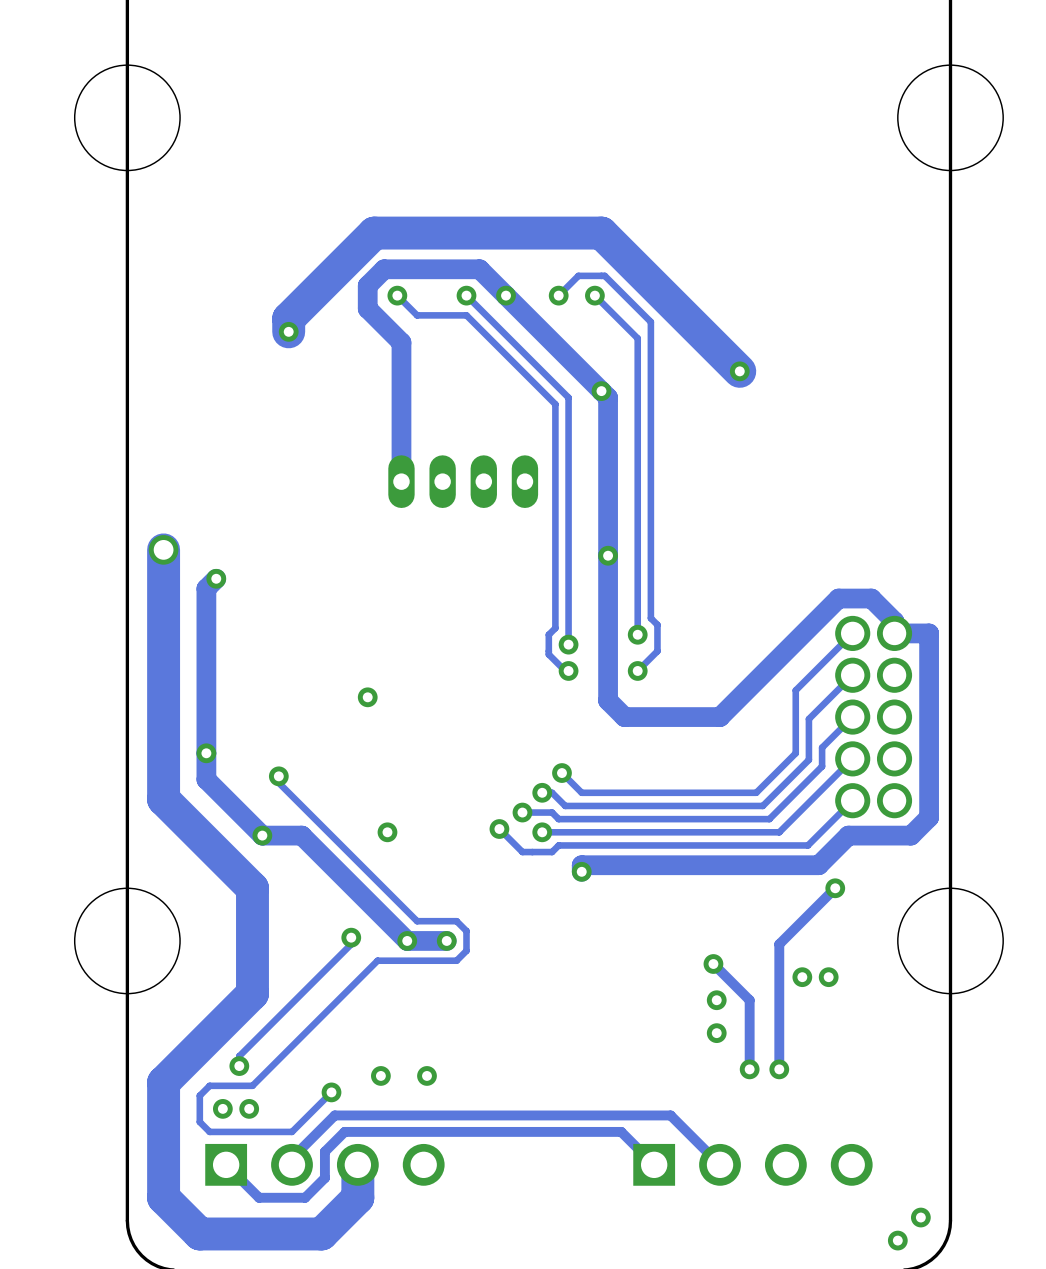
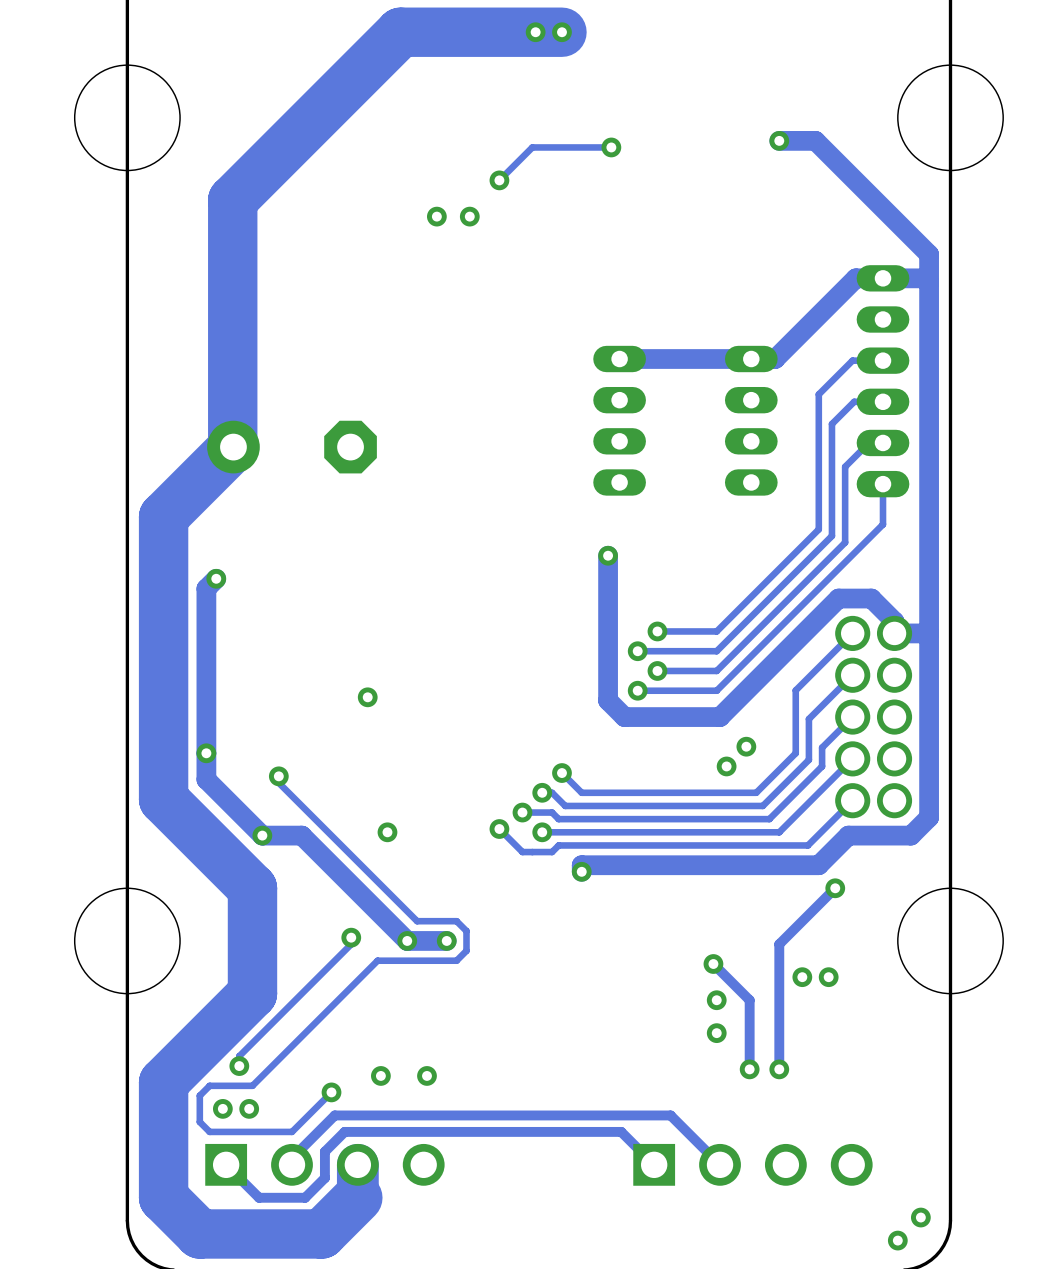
via: none -> (535, 32)
track: none -> (561, 32) (400, 32) (232, 200) (232, 447)
via: none -> (561, 32)
track: none -> (779, 140) (815, 140) (929, 254) (929, 633)
via: none -> (779, 140)
track: none -> (611, 147) (532, 147) (499, 180)
via: none -> (611, 147)
via: none -> (499, 180)
via: none -> (436, 216)
via: none -> (469, 216)
track: none -> (929, 282) (924, 278) (855, 278) (775, 359) (619, 359)
track: (397, 295) (417, 315) (466, 315) (555, 404) (555, 628) (548, 634) (548, 654) (565, 670) (568, 670) -> none
via: (397, 295) -> none
track: (466, 295) (568, 397) (568, 644) -> none
via: (466, 295) -> none
via: (506, 295) -> none
track: (558, 295) (578, 275) (604, 275) (650, 321) (650, 618) (657, 624) (657, 651) (637, 670) -> none
via: (558, 295) -> none
track: (594, 295) (637, 338) (637, 634) -> none
via: (594, 295) -> none
track: (288, 331) (288, 318) (374, 233) (601, 233) (739, 371) -> none
via: (288, 331) -> none
track: none -> (883, 360) (852, 360) (818, 394) (818, 529) (716, 631) (657, 631)
via: (739, 371) -> none
part: none -> (883, 381)
via: (601, 391) -> none
track: none -> (883, 401) (854, 401) (831, 424) (831, 535) (716, 651) (637, 651)
part: none -> (619, 420)
part: none -> (751, 420)
track: none -> (883, 442) (869, 442) (845, 466) (845, 542) (716, 670) (657, 670)
track: none -> (233, 447) (163, 516) (163, 549)
part: none -> (292, 447)
track: (401, 481) (401, 342) (367, 308) (367, 285) (384, 269) (479, 269) (608, 397) (608, 555) -> none
part: (463, 481) -> none
track: none -> (883, 484) (883, 524) (716, 690) (637, 690)
track width: thin (163, 549) (163, 799) (252, 888) (252, 993) (163, 1082) (163, 1197) (199, 1233) (321, 1233) (357, 1197) (357, 1164) -> thick (163, 549) (163, 799) (252, 888) (252, 993) (163, 1082) (163, 1197) (199, 1233) (321, 1233) (357, 1197) (357, 1164)
via: (163, 549) -> none
via: none -> (657, 631)
via: (637, 634) -> none
via: (568, 644) -> none
via: none -> (637, 651)
via: (568, 670) -> none
via: (637, 670) -> none
via: none -> (657, 670)
via: none -> (637, 690)
via: none -> (746, 746)
via: none -> (726, 766)

